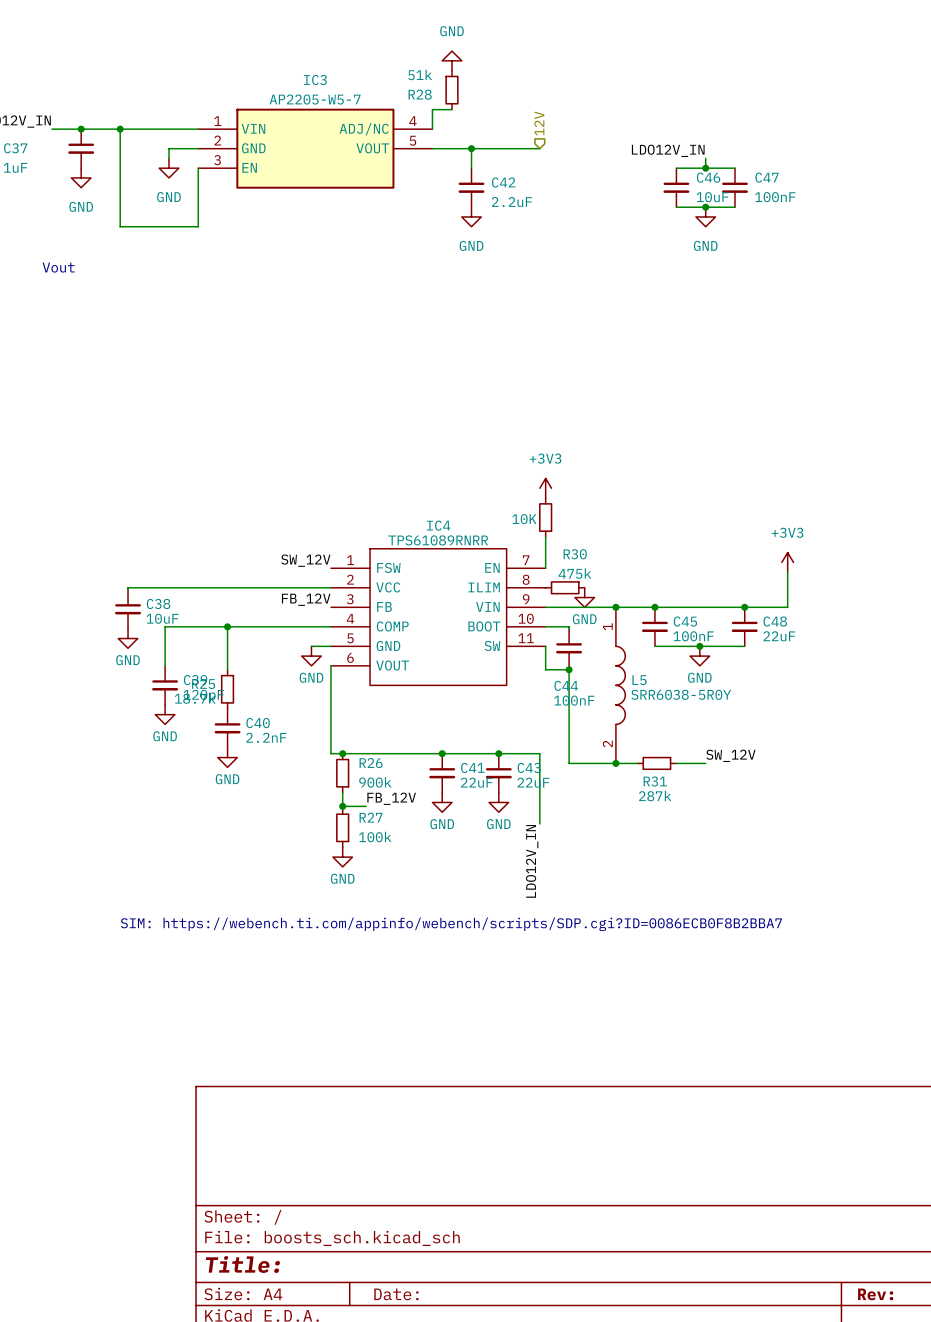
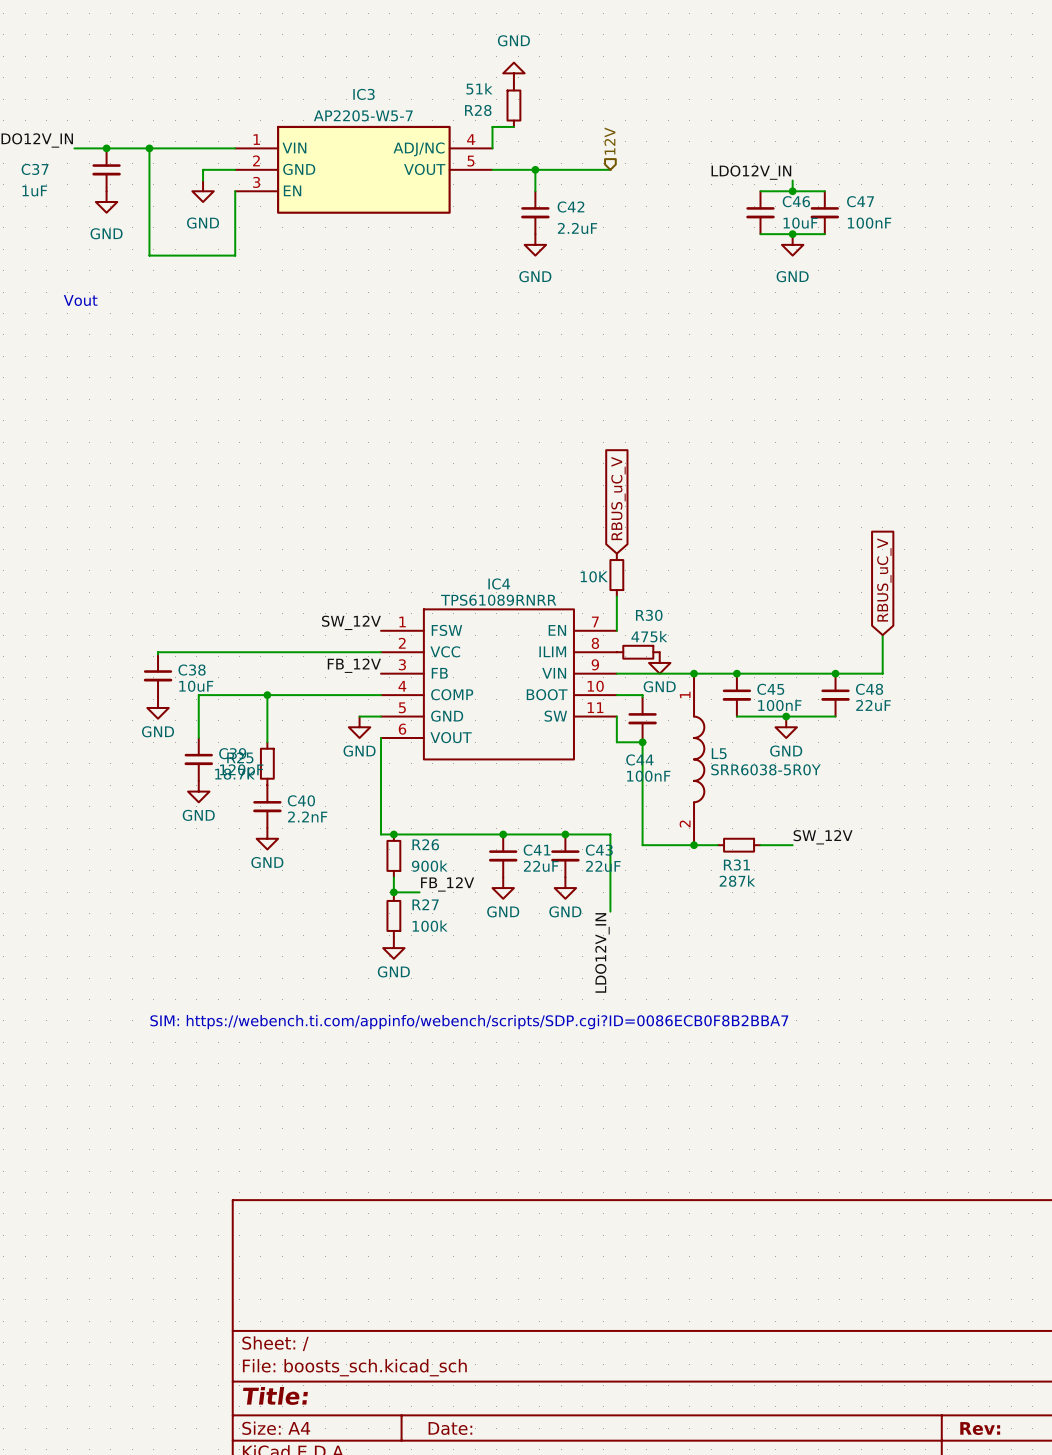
global label: none -> RBUS_uC_V (618, 498)
power symbol: +3V3 (545, 488) -> none
global label: none -> RBUS_uC_V (884, 579)
power symbol: +3V3 (787, 562) -> none

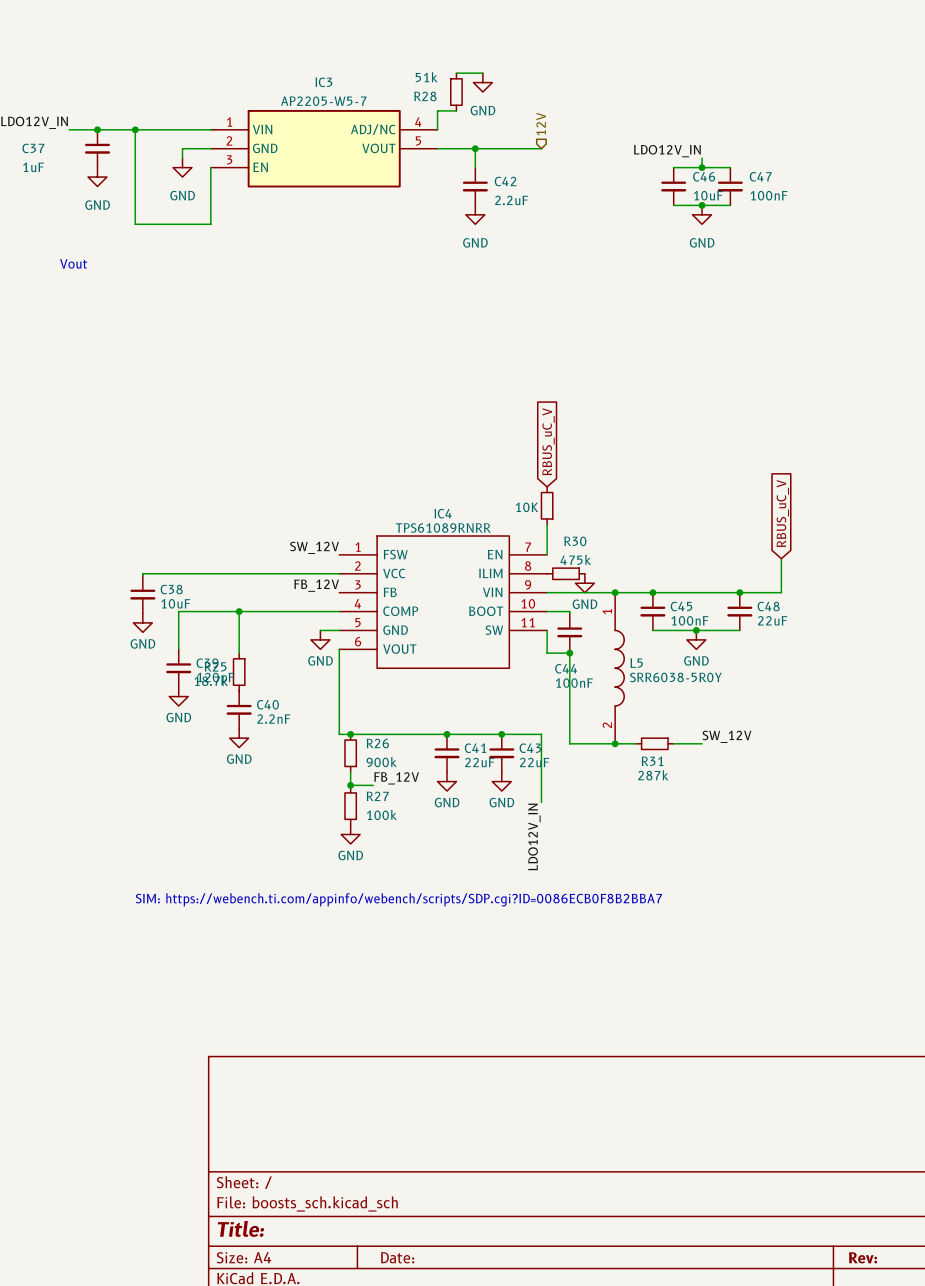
power symbol rotation: 0° (513, 73) -> 180° (482, 82)
power symbol position: GND (513, 73) -> GND (482, 82)
wire: none -> (456, 73) (482, 73)

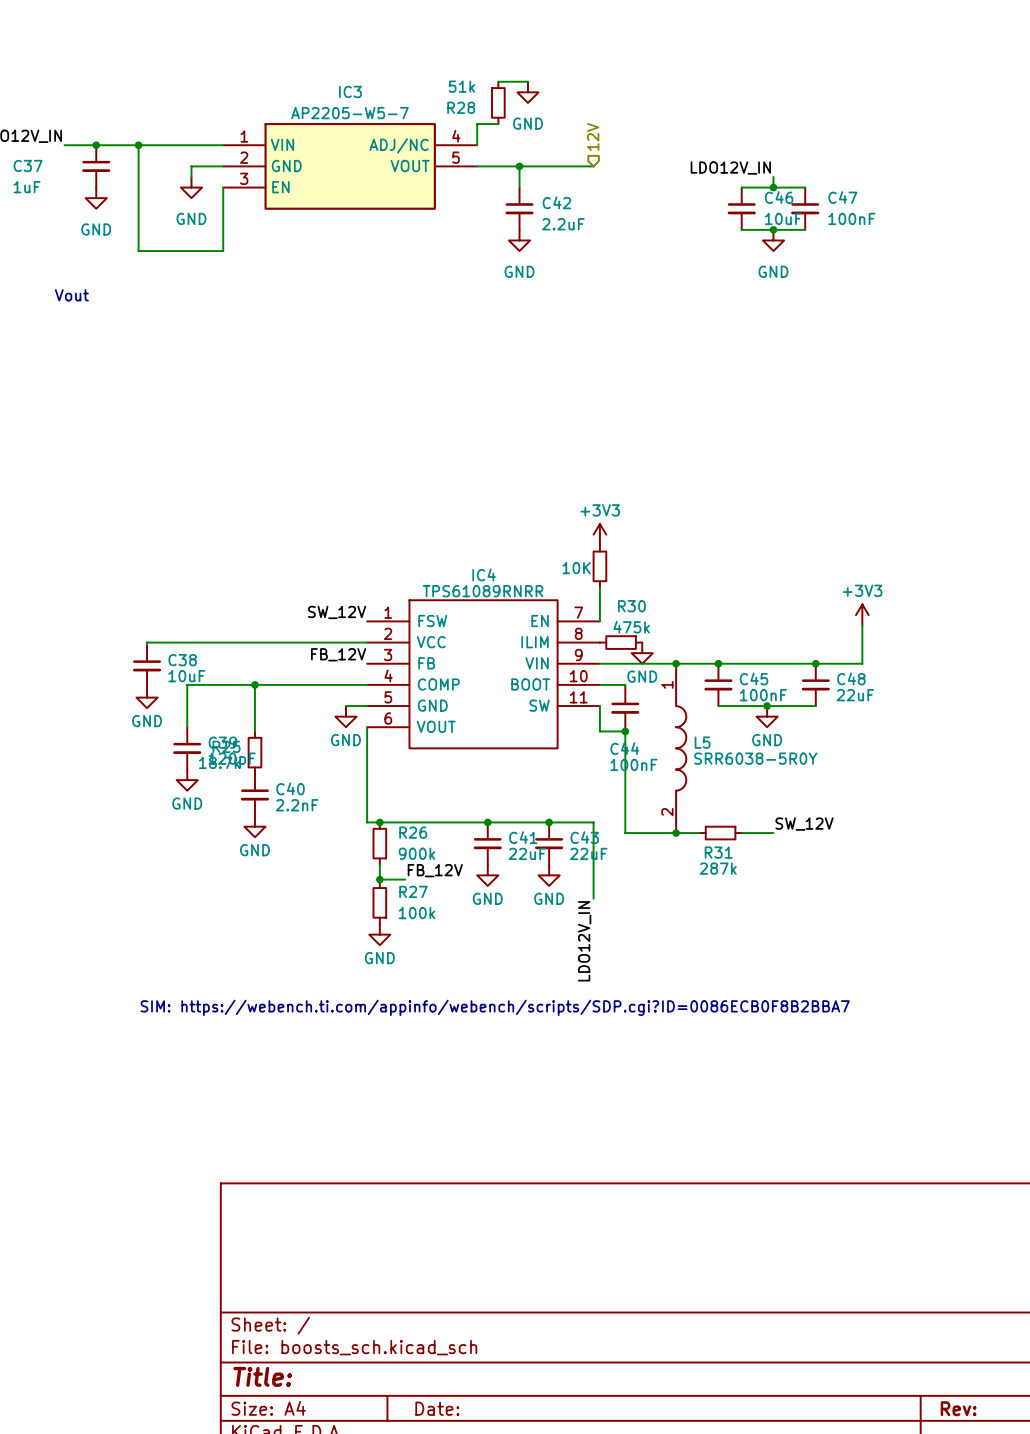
global label: RBUS_uC_V (548, 441) -> none
power symbol: none -> +3V3 (599, 534)
global label: RBUS_uC_V (782, 513) -> none
power symbol: none -> +3V3 (862, 615)

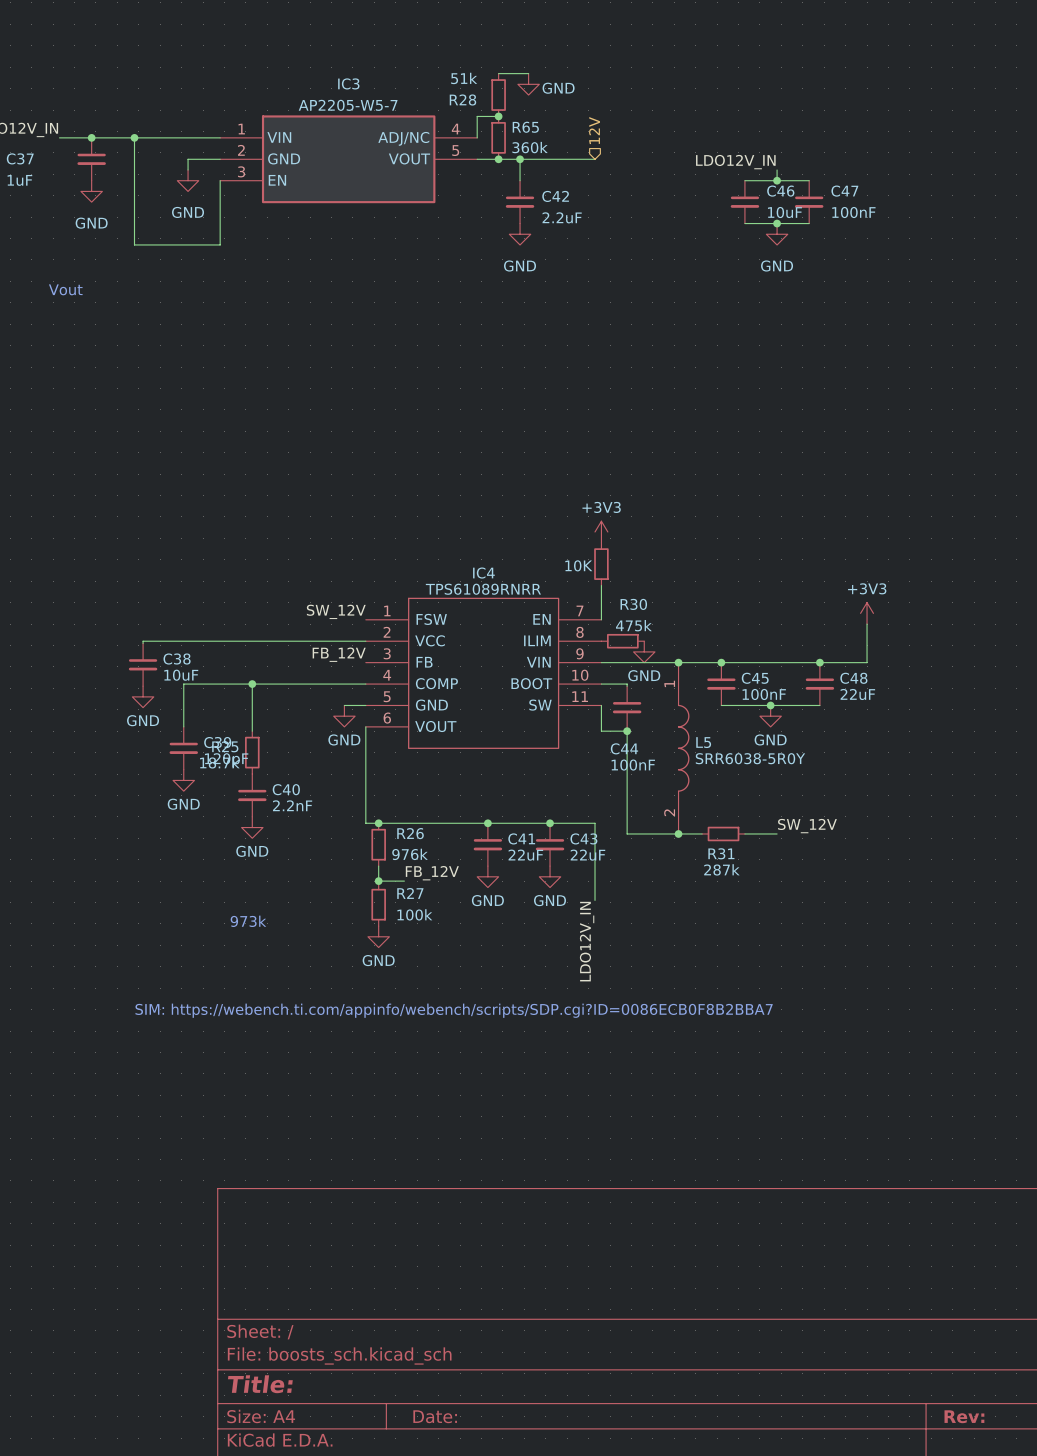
power symbol text position: GND (527, 123) -> GND (558, 88)
junction: none -> (498, 116)
R65: none -> 360k (498, 137)
junction: none -> (498, 159)
R26 value: 900k (417, 853) -> 976k (410, 854)
text: none -> 973k (248, 921)

